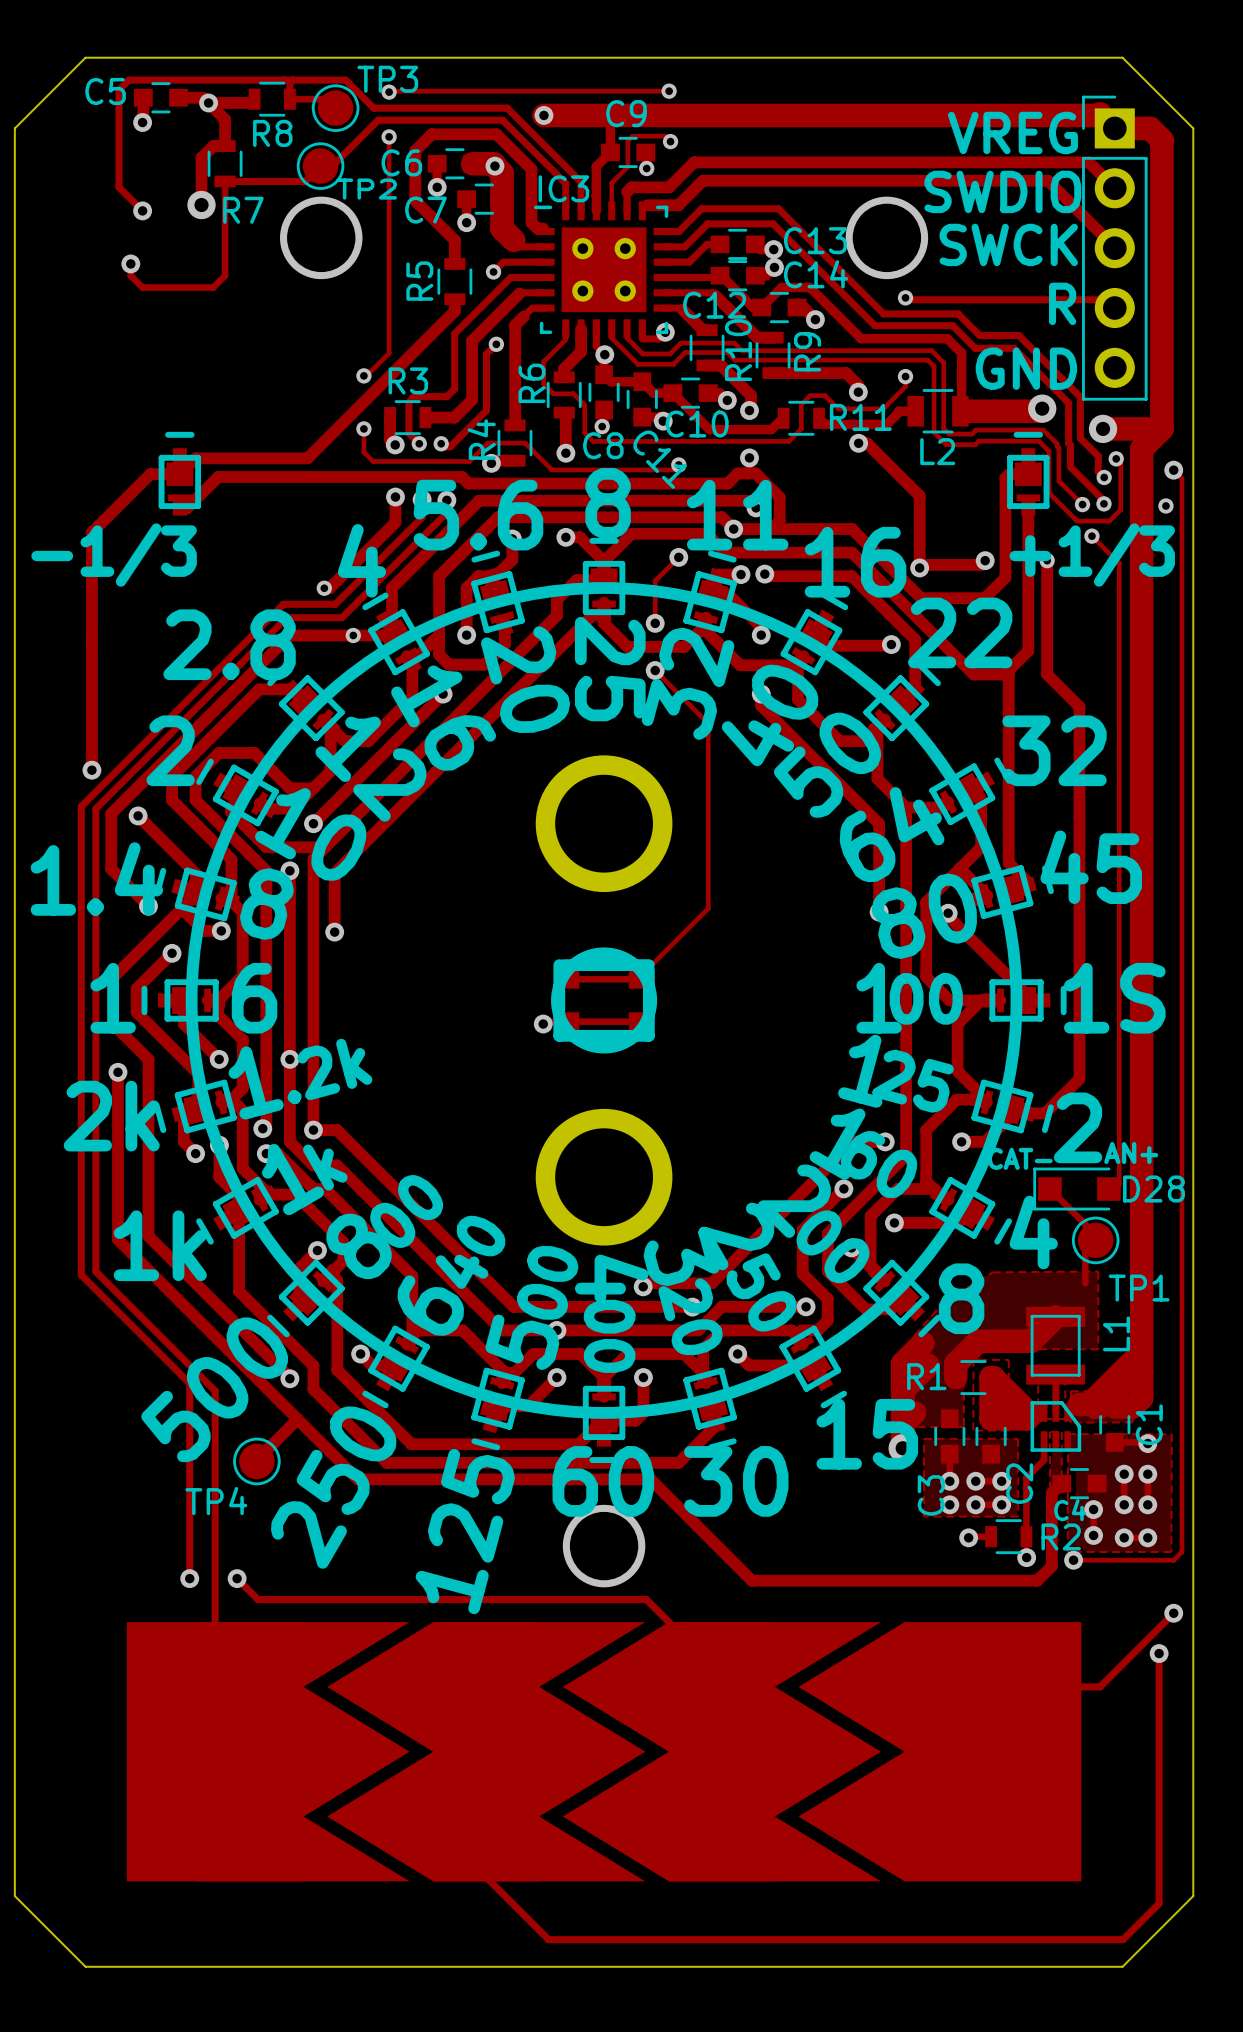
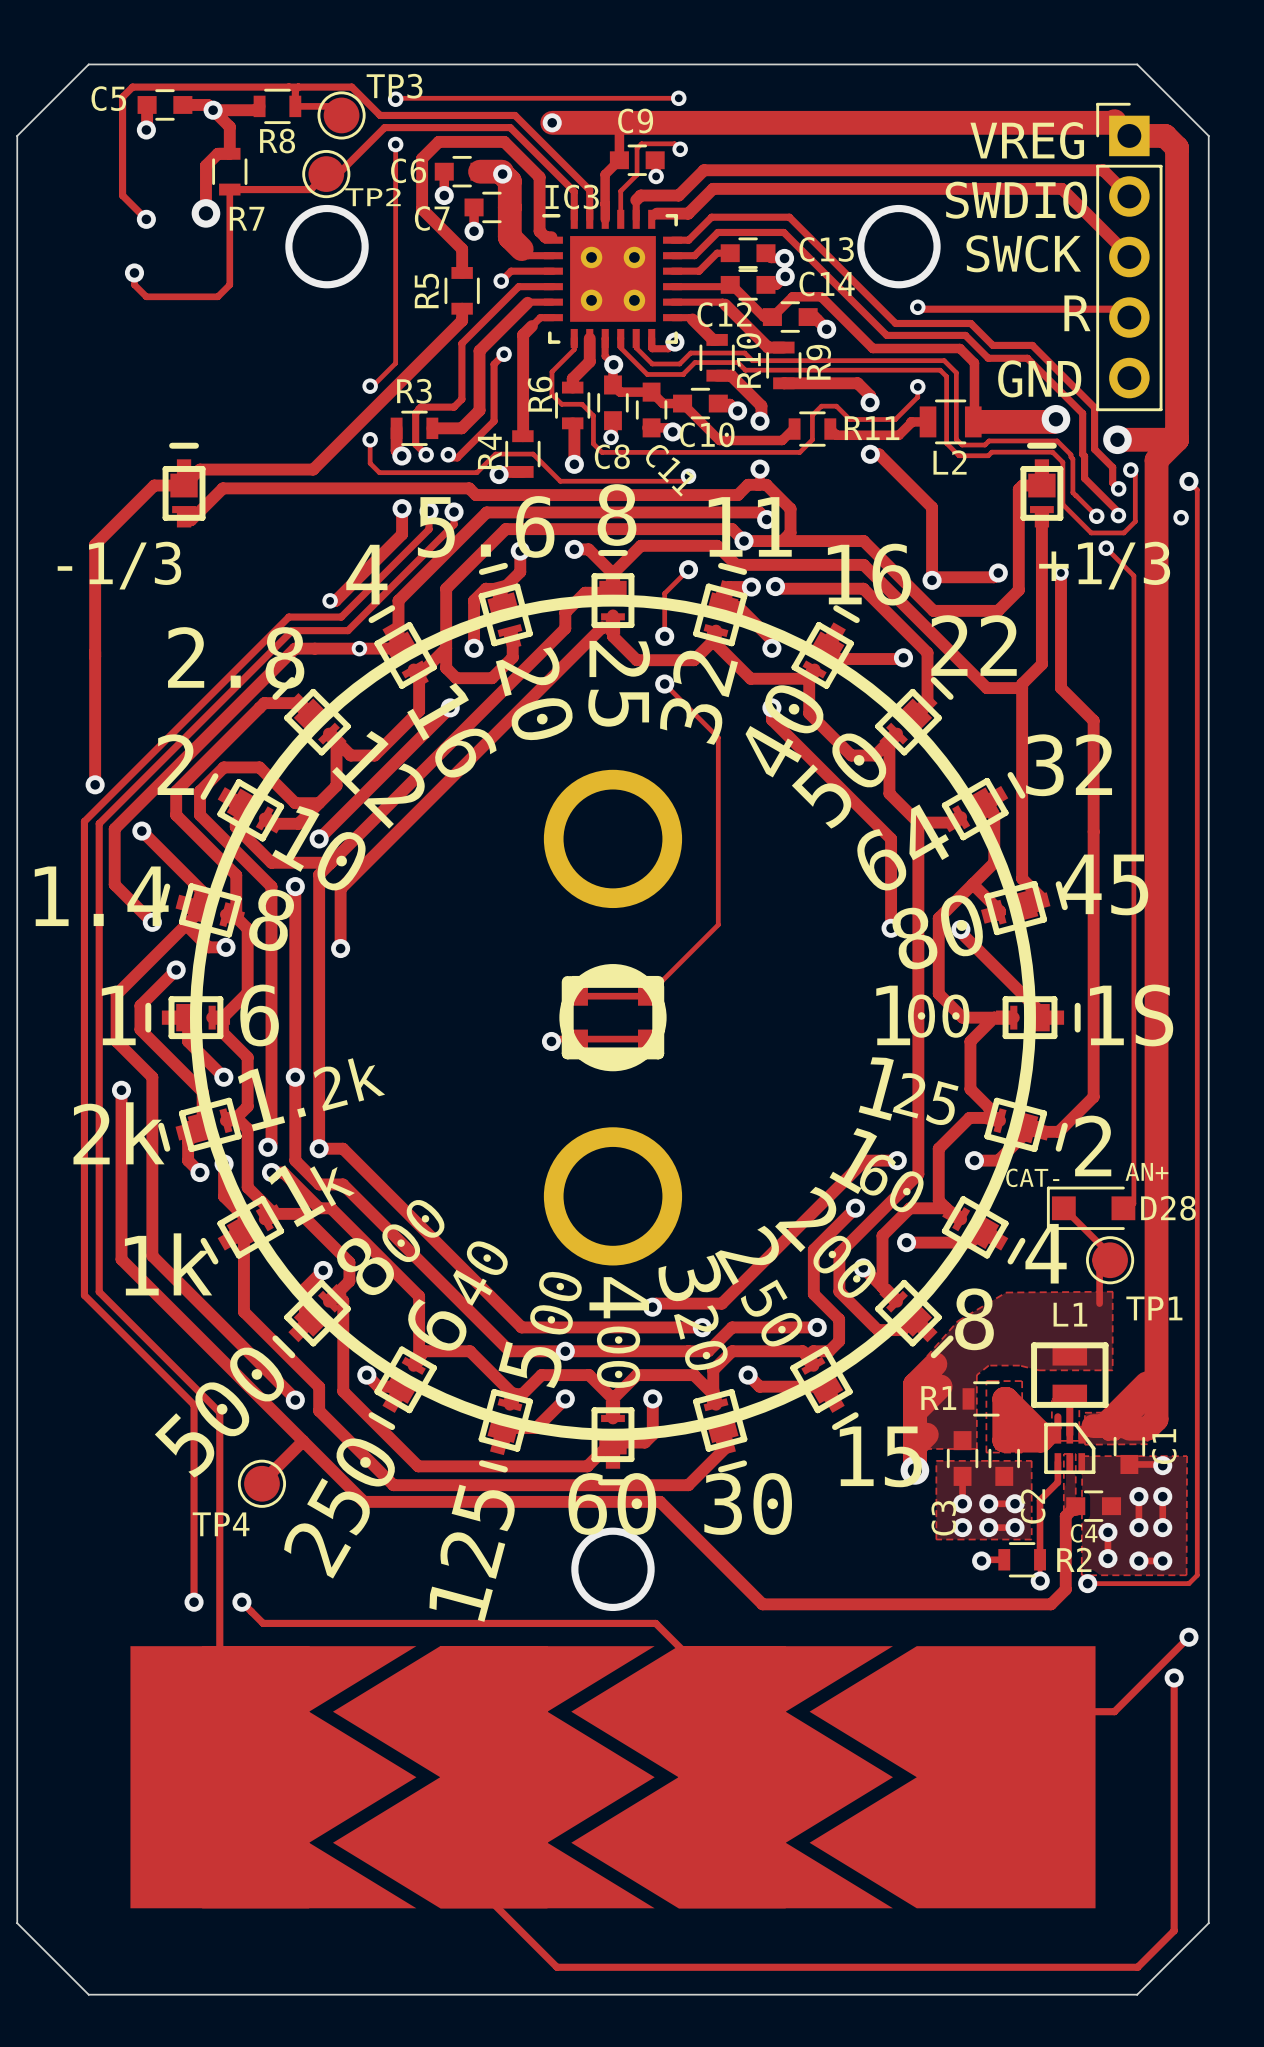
L1 footprint: [1026, 1306, 1086, 1385] -> [1031, 1342, 1109, 1408]
track: (1055, 1316) (1031, 1341) (978, 1341) (955, 1363) (955, 1377) -> none
L1 name rotation: 0° (1116, 1333) -> 90° clockwise (1070, 1314)
L1 name position: L1 (1116, 1333) -> L1 (1070, 1314)
track: none -> (1057, 1416) (1057, 1427)

